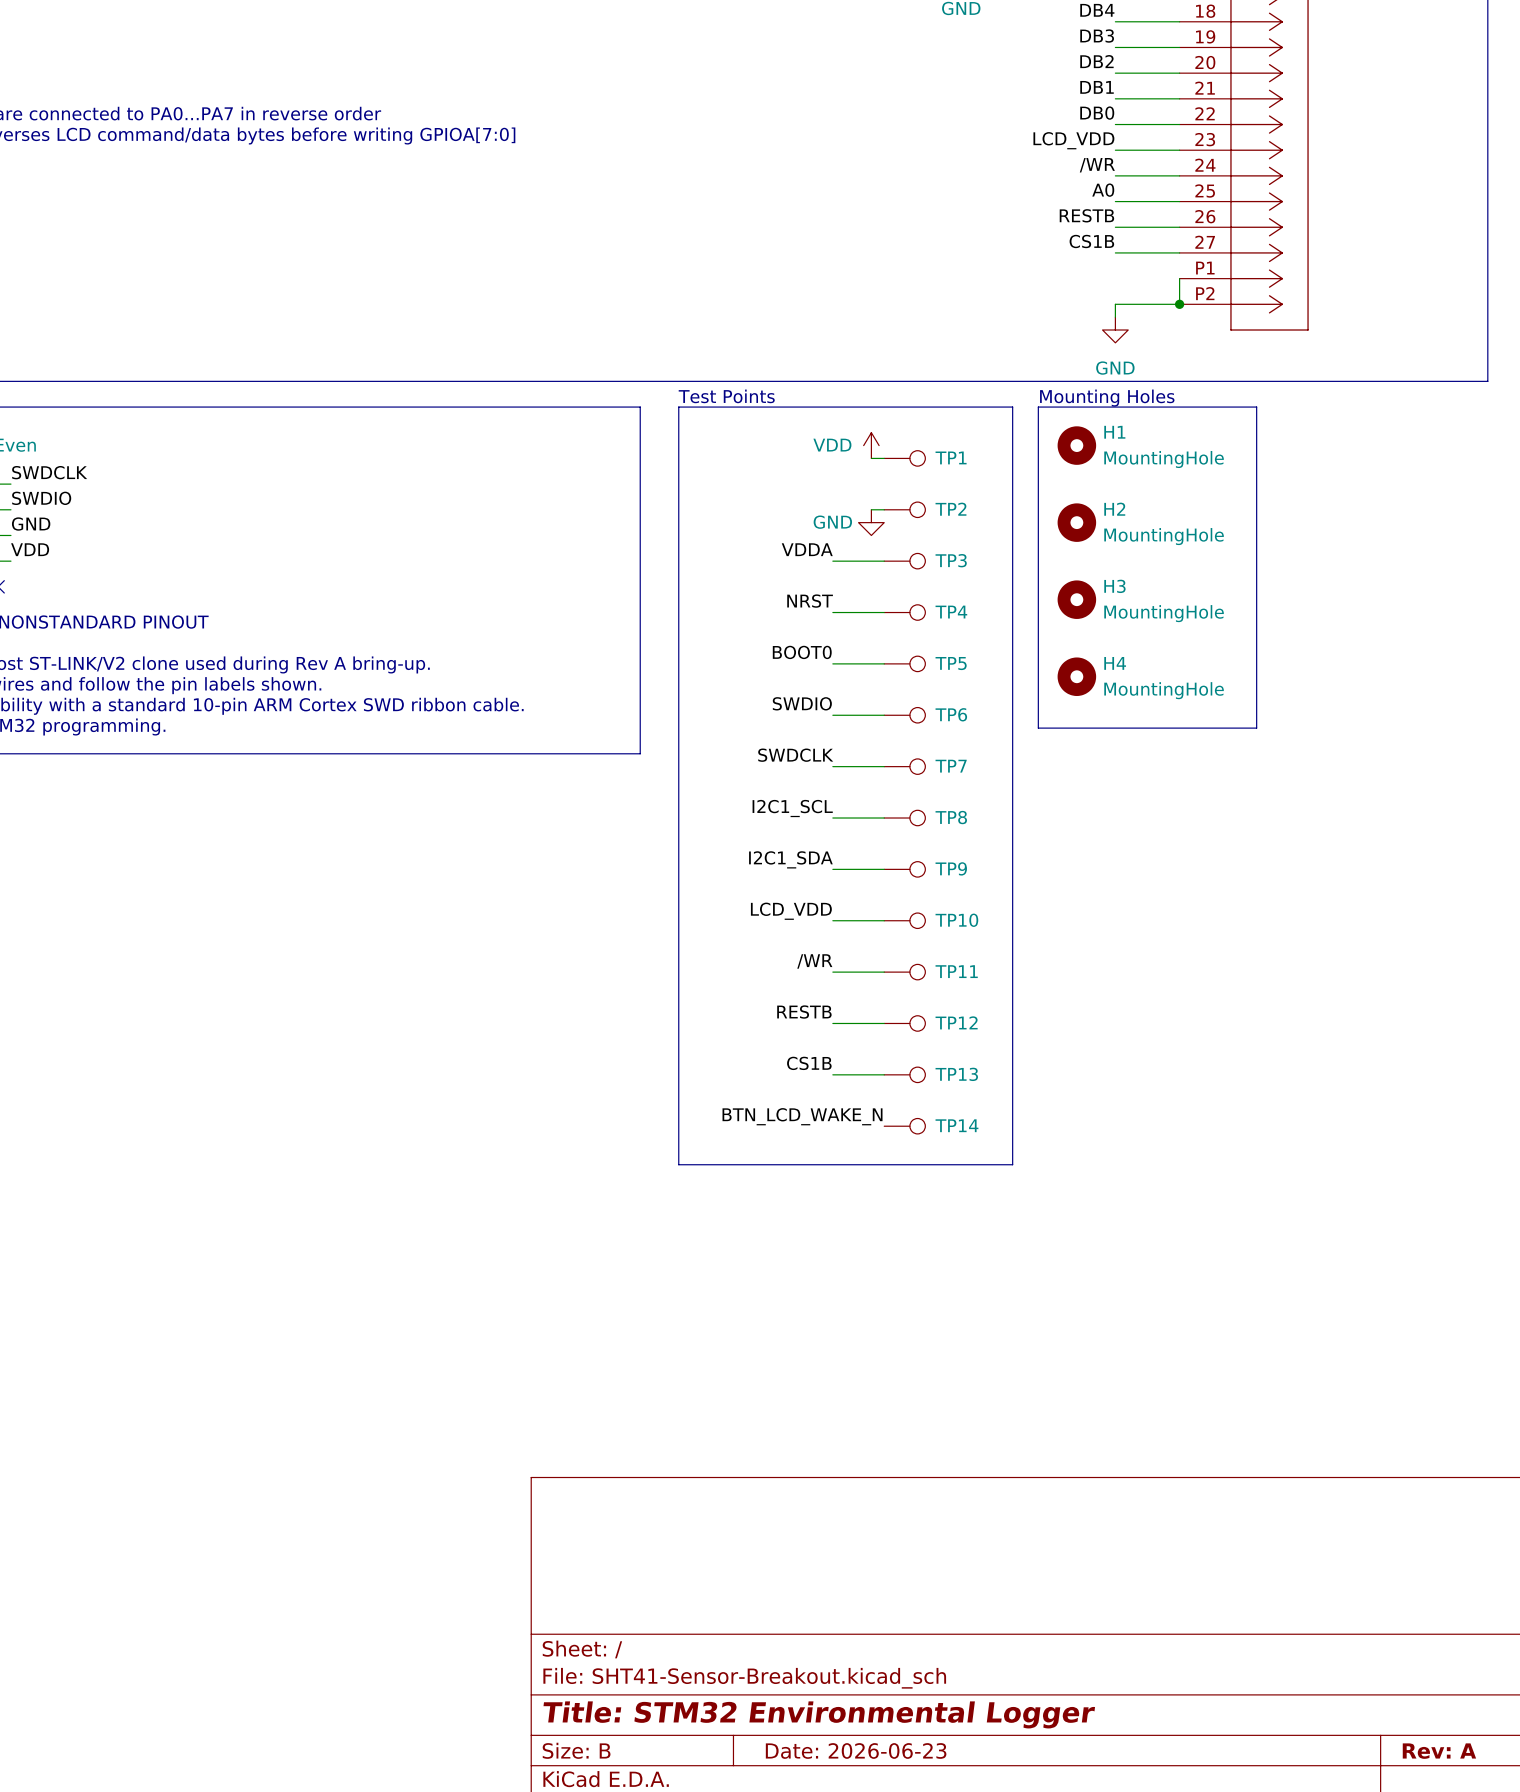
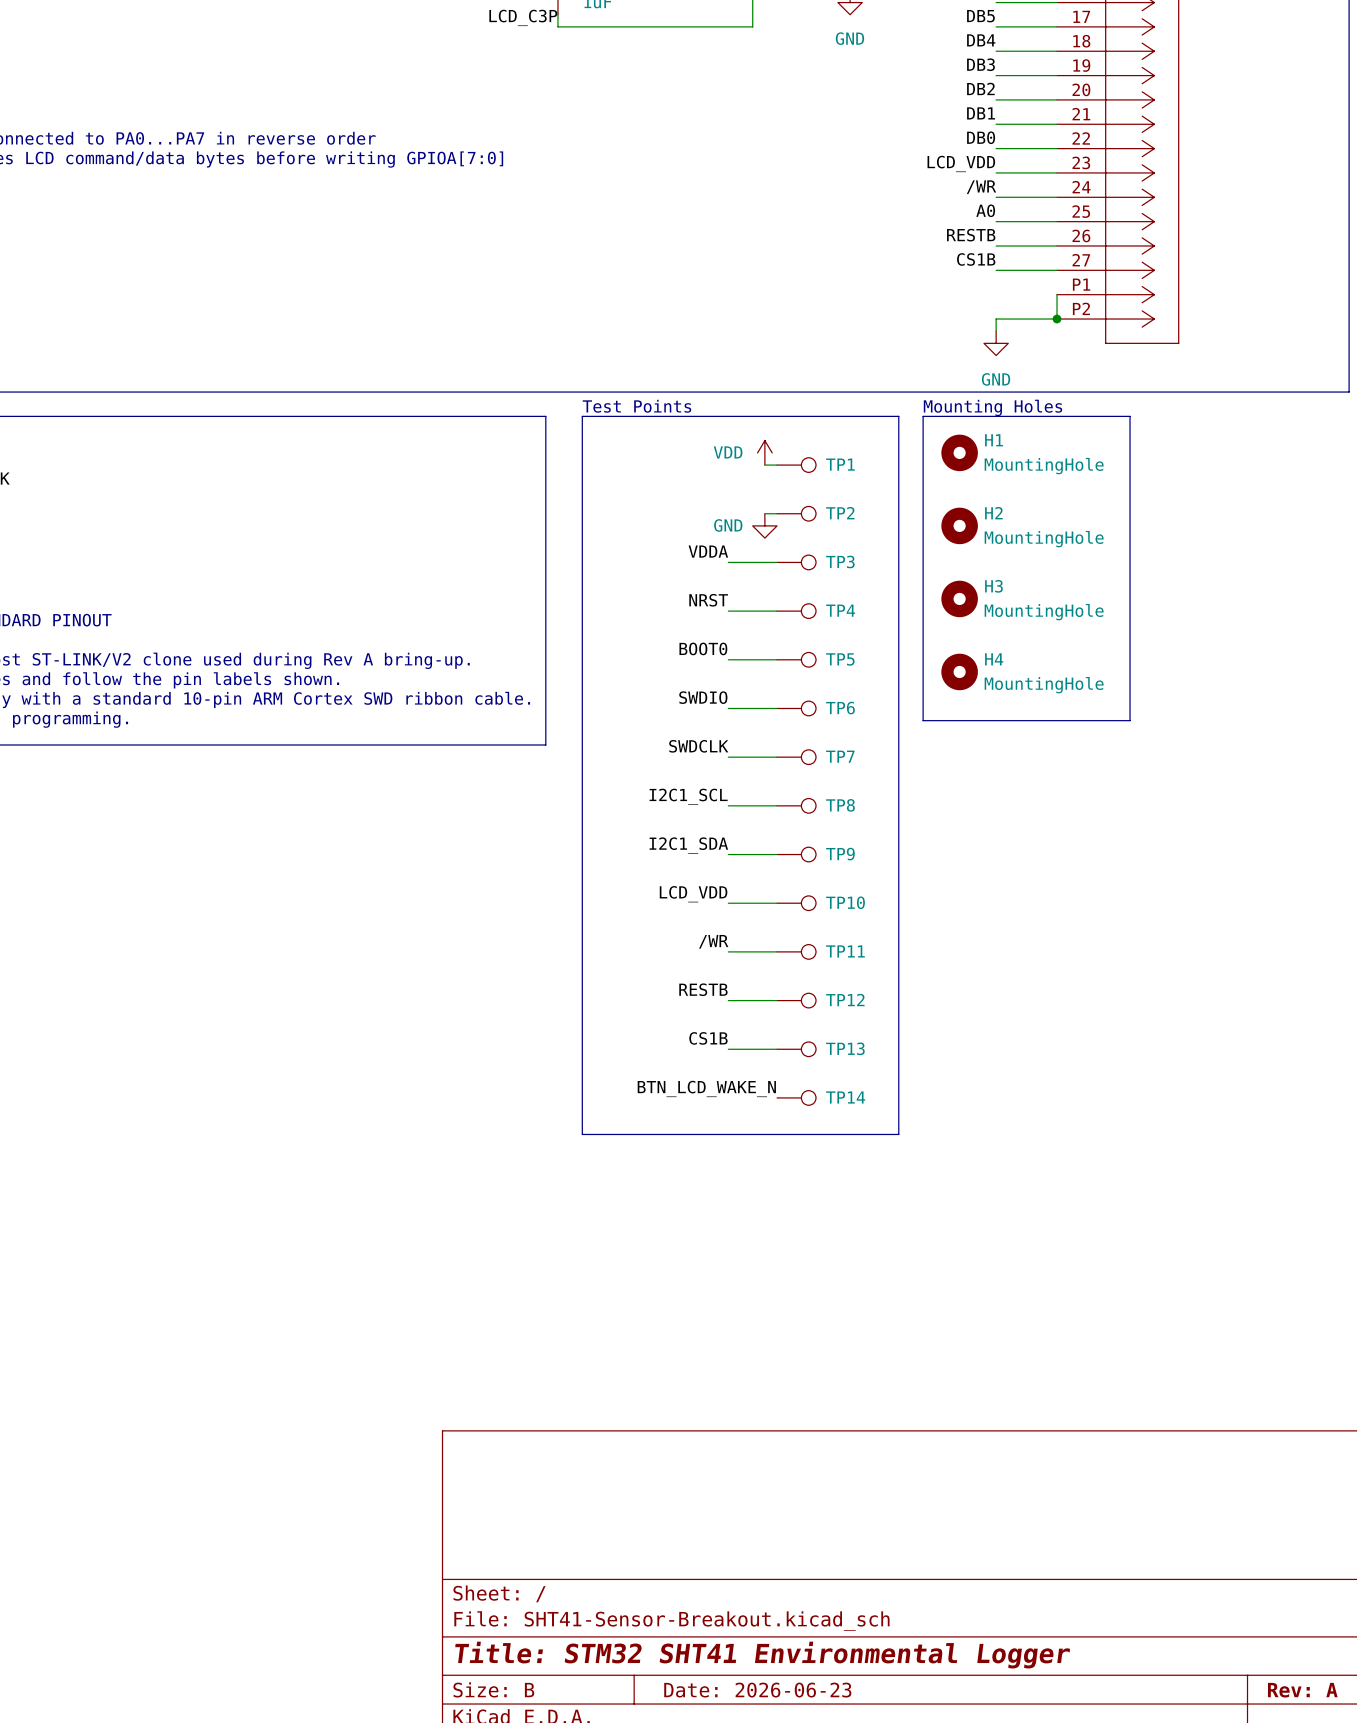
title block: Title: STM32 Environmental Logger (819, 1714) -> Title: STM32 SHT41 Environmental Logger (762, 1655)

